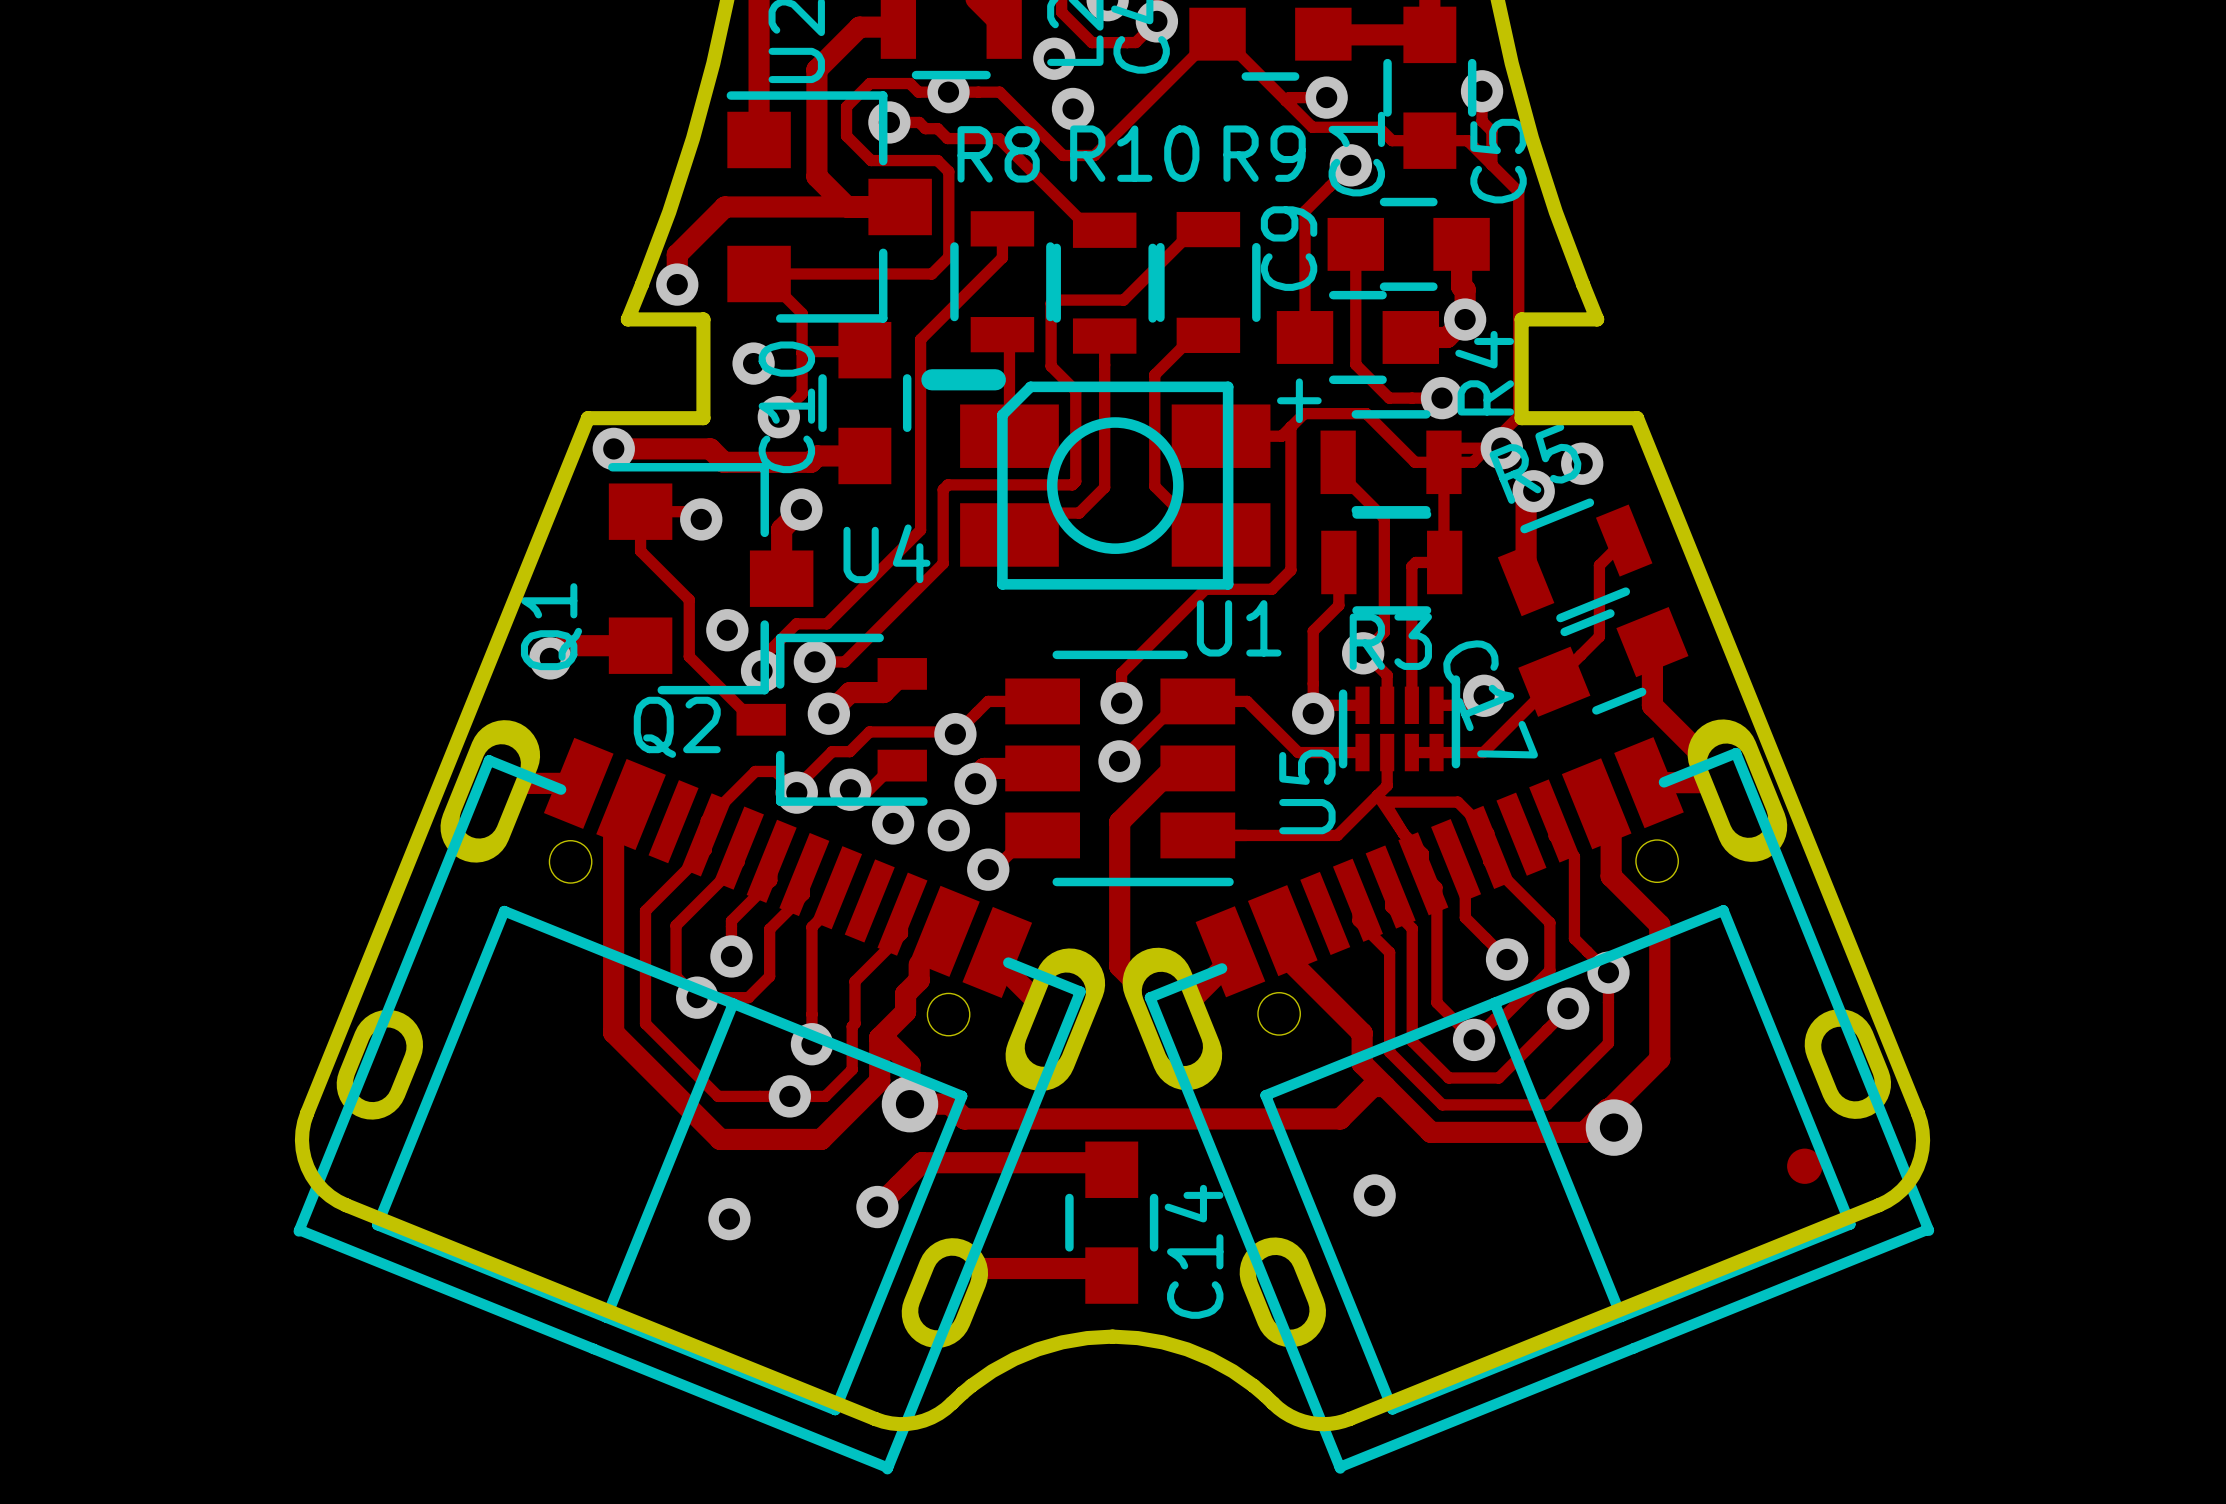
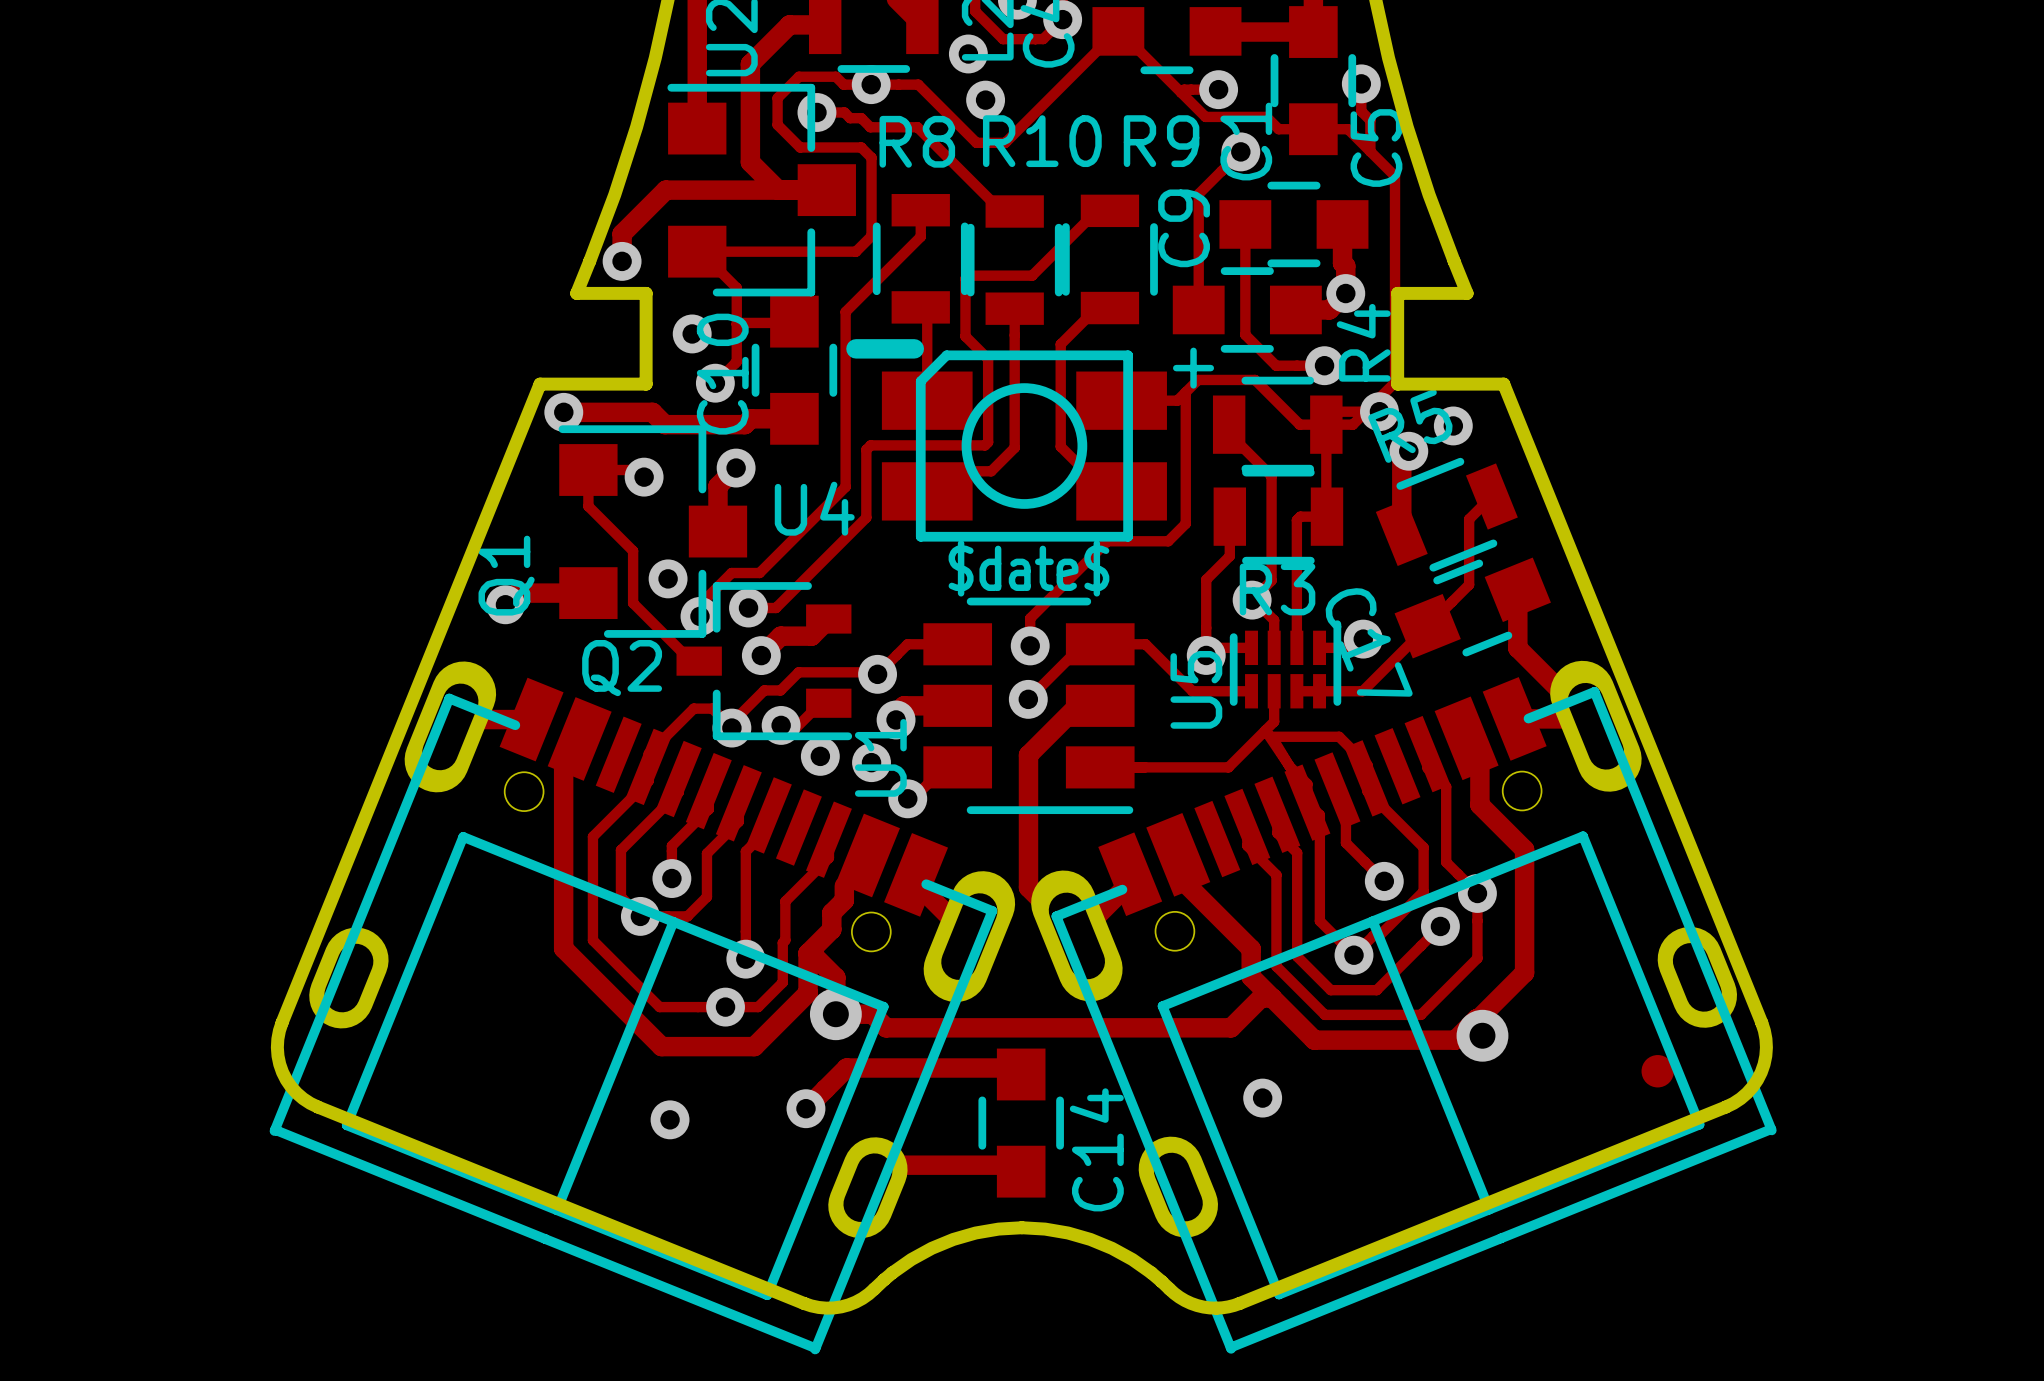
text: none -> $date$ (1028, 568)
U1 name rotation: 0° (1239, 628) -> 90° counterclockwise (880, 757)
U1 name position: U1 (1239, 628) -> U1 (880, 757)
U5 name position: U5 (1307, 791) -> U5 (1196, 689)

